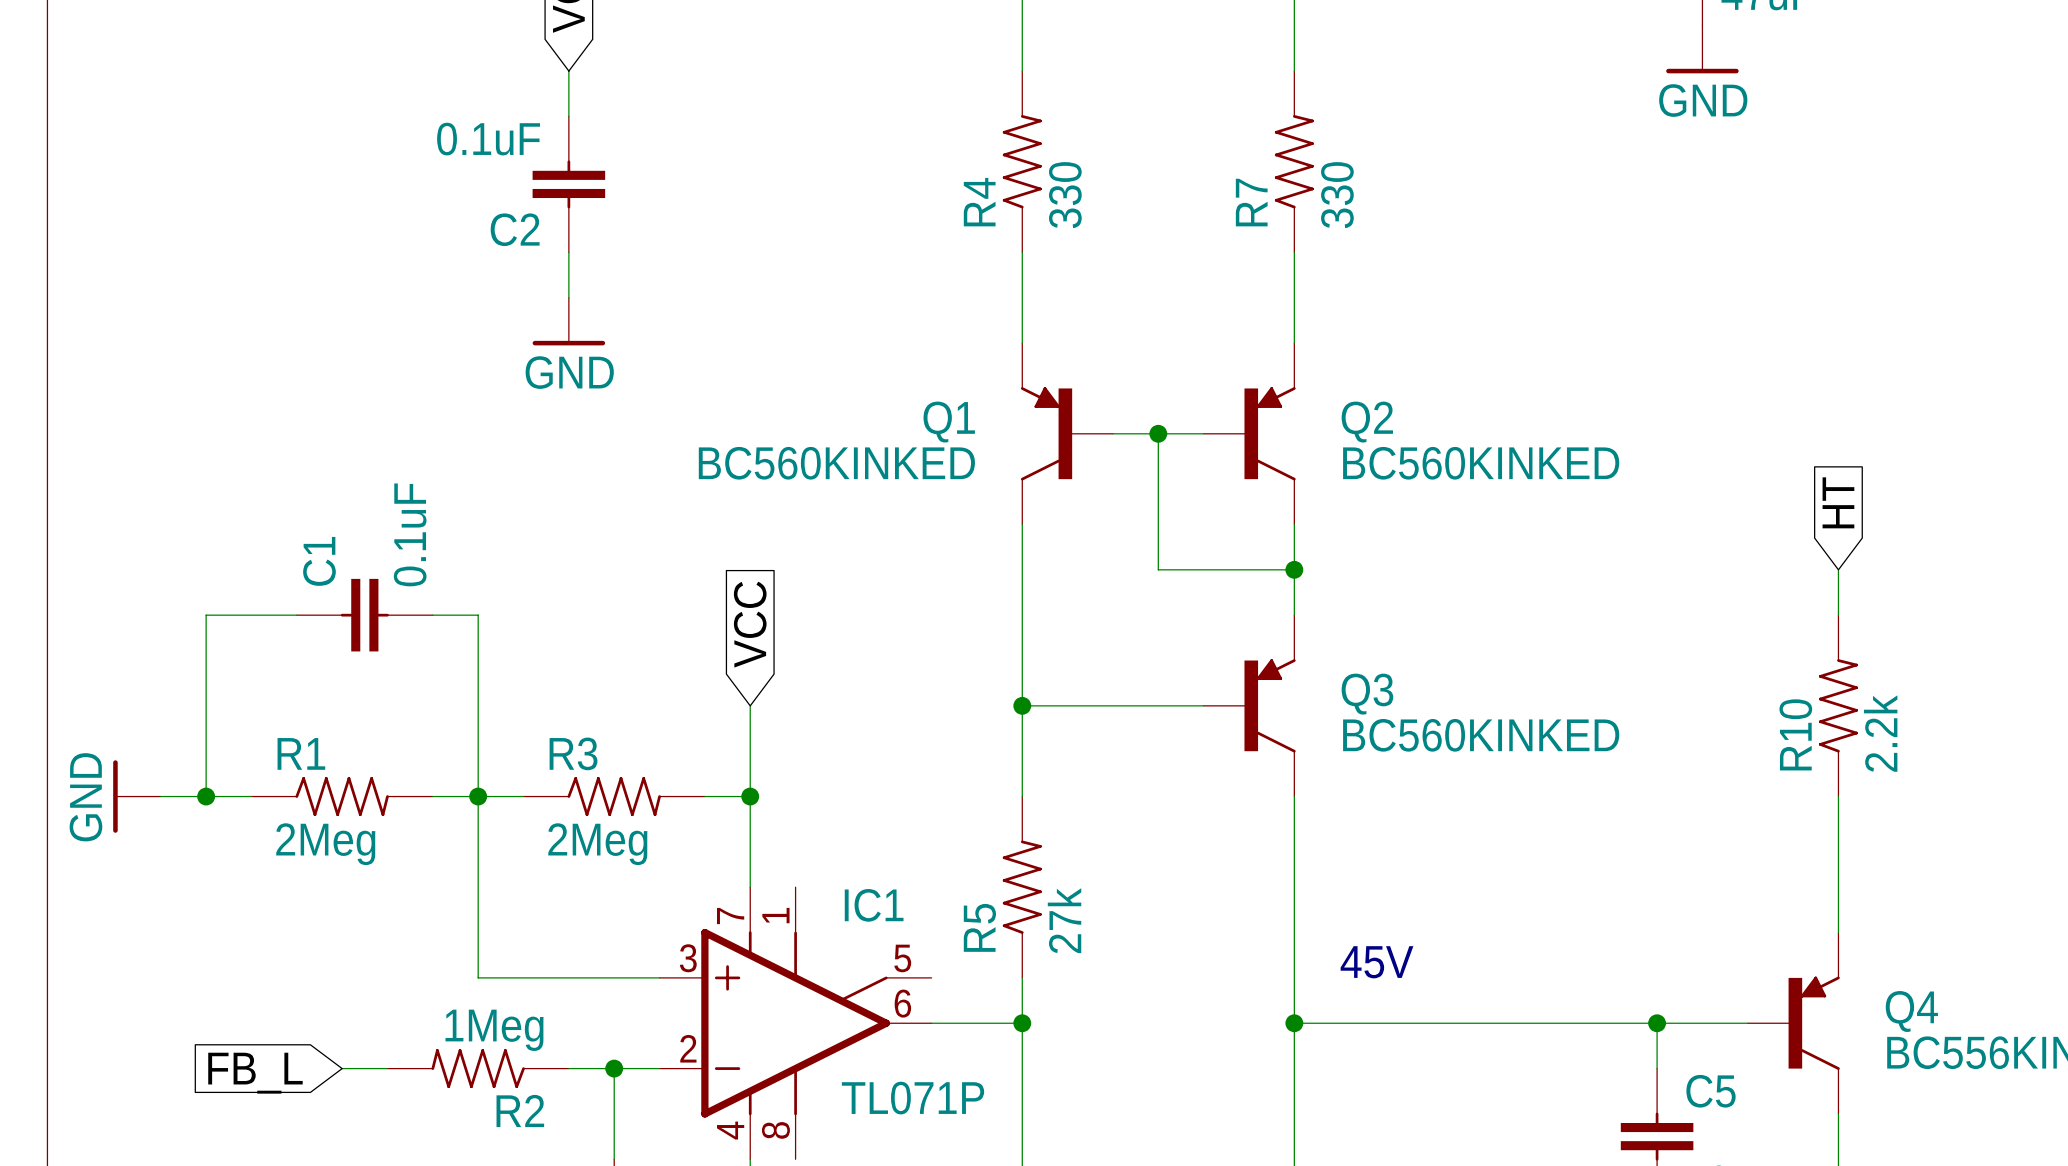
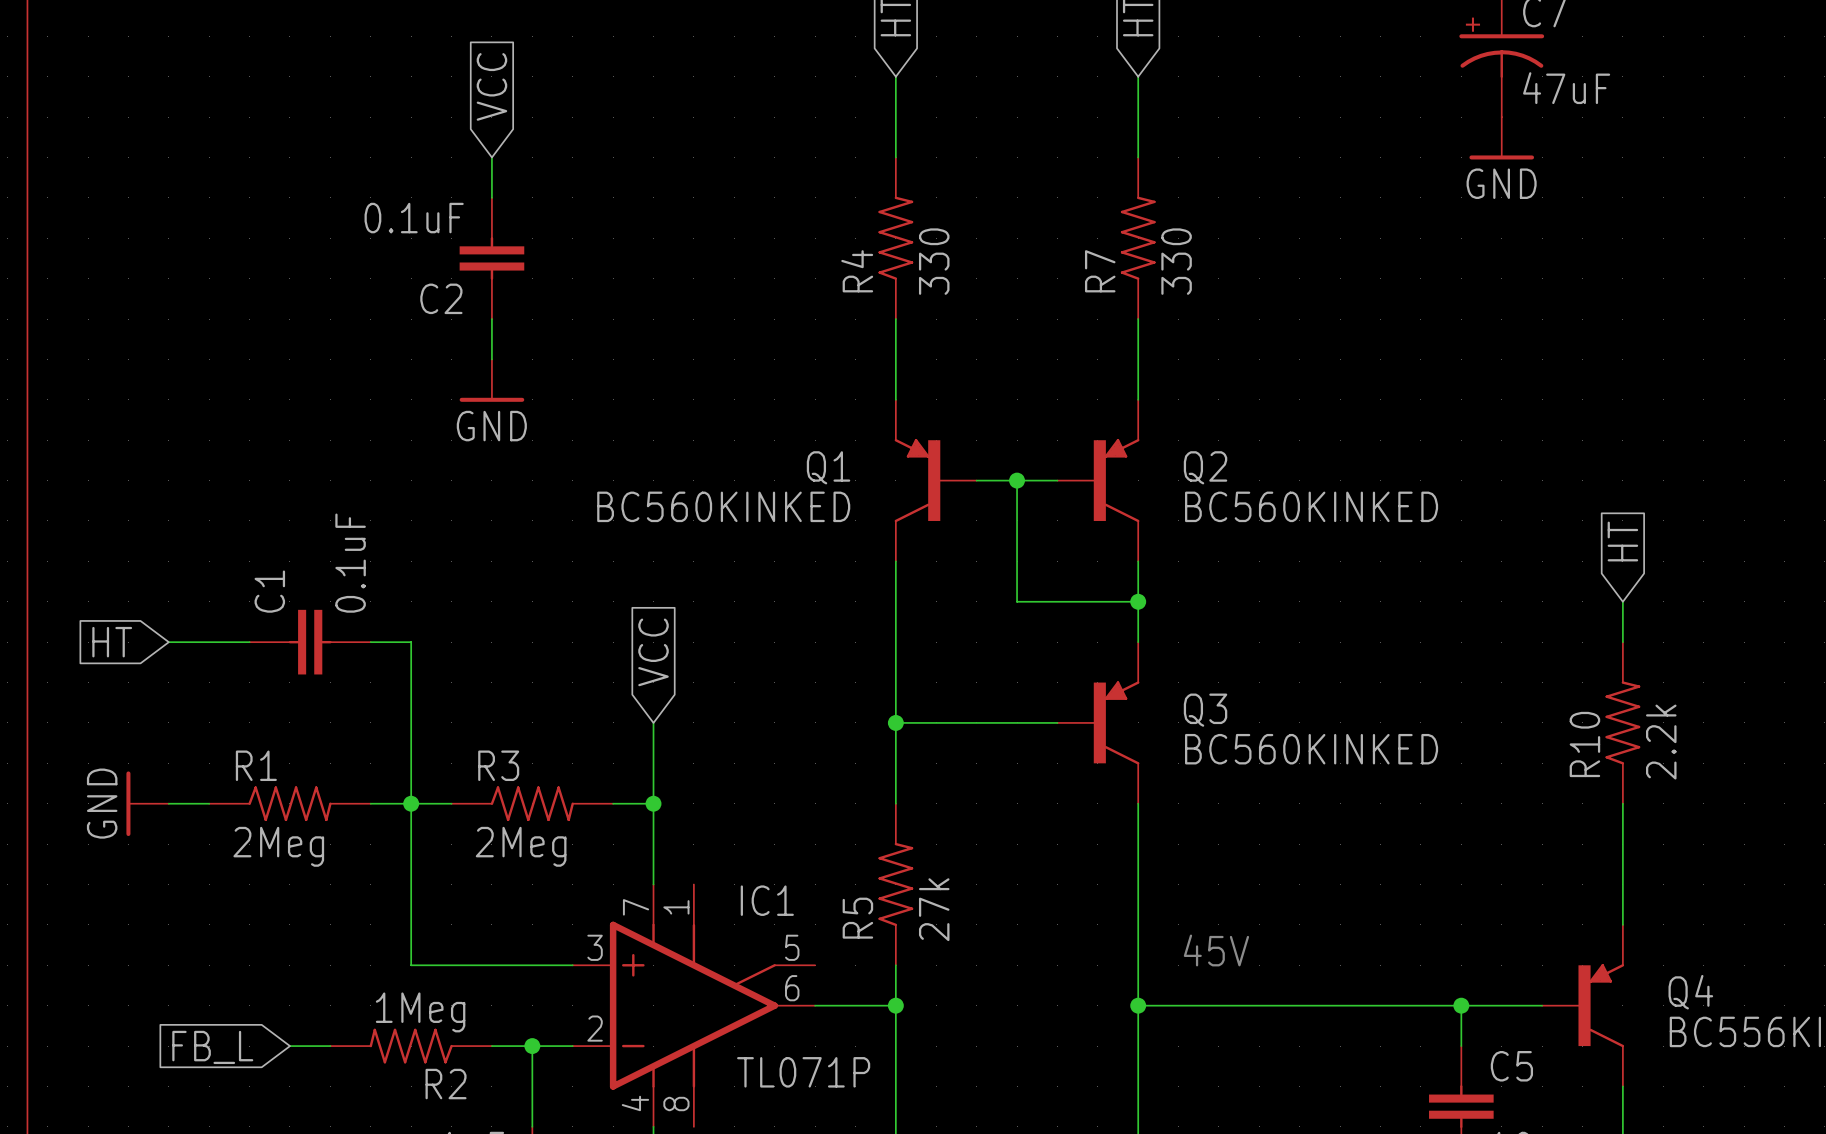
global label: none -> HT (112, 642)
wire: (206, 615) (206, 796) (160, 796) -> none
power symbol position: GND (136, 796) -> GND (147, 803)
junction: (206, 796) -> none

